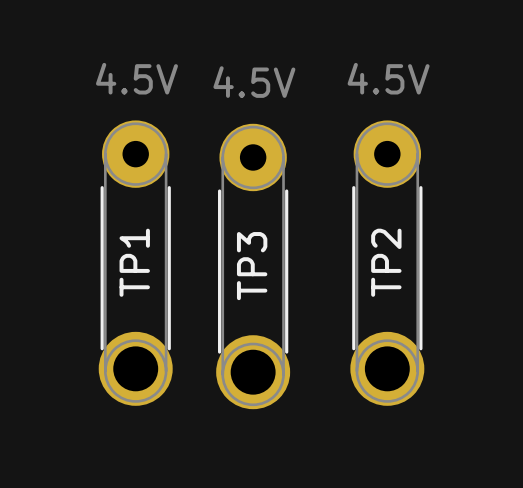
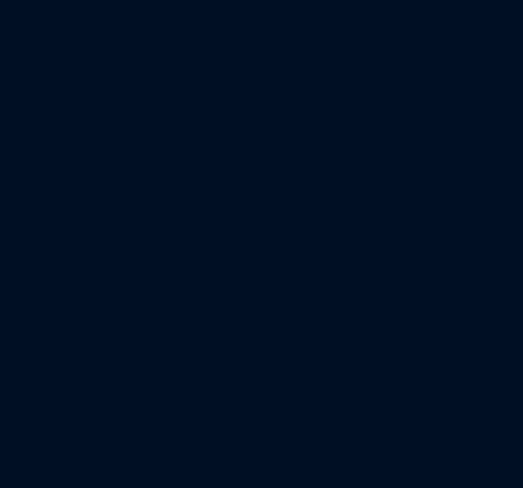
TP1: 4.5V (135, 263) -> none
TP2: 4.5V (387, 263) -> none
TP3: 4.5V (253, 266) -> none

